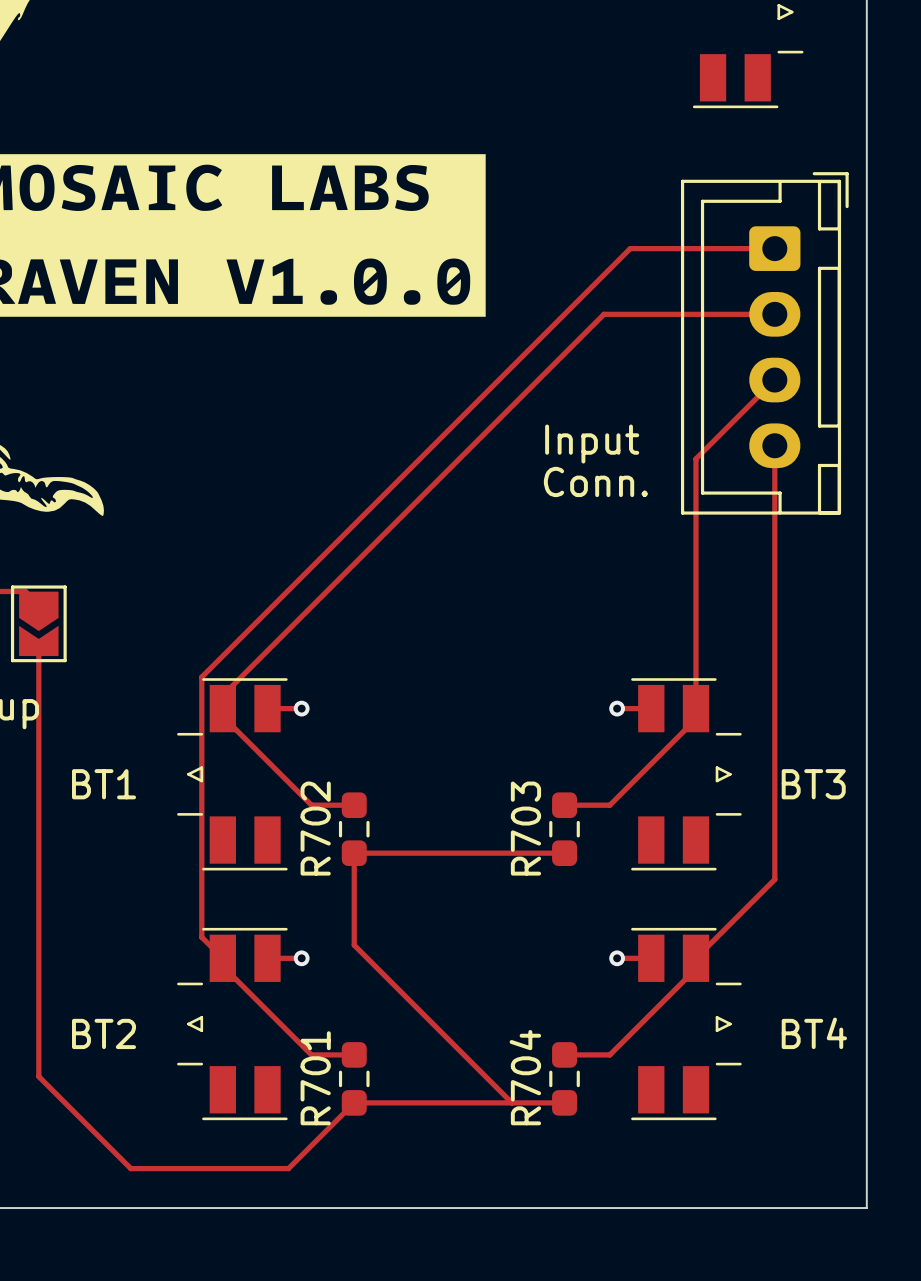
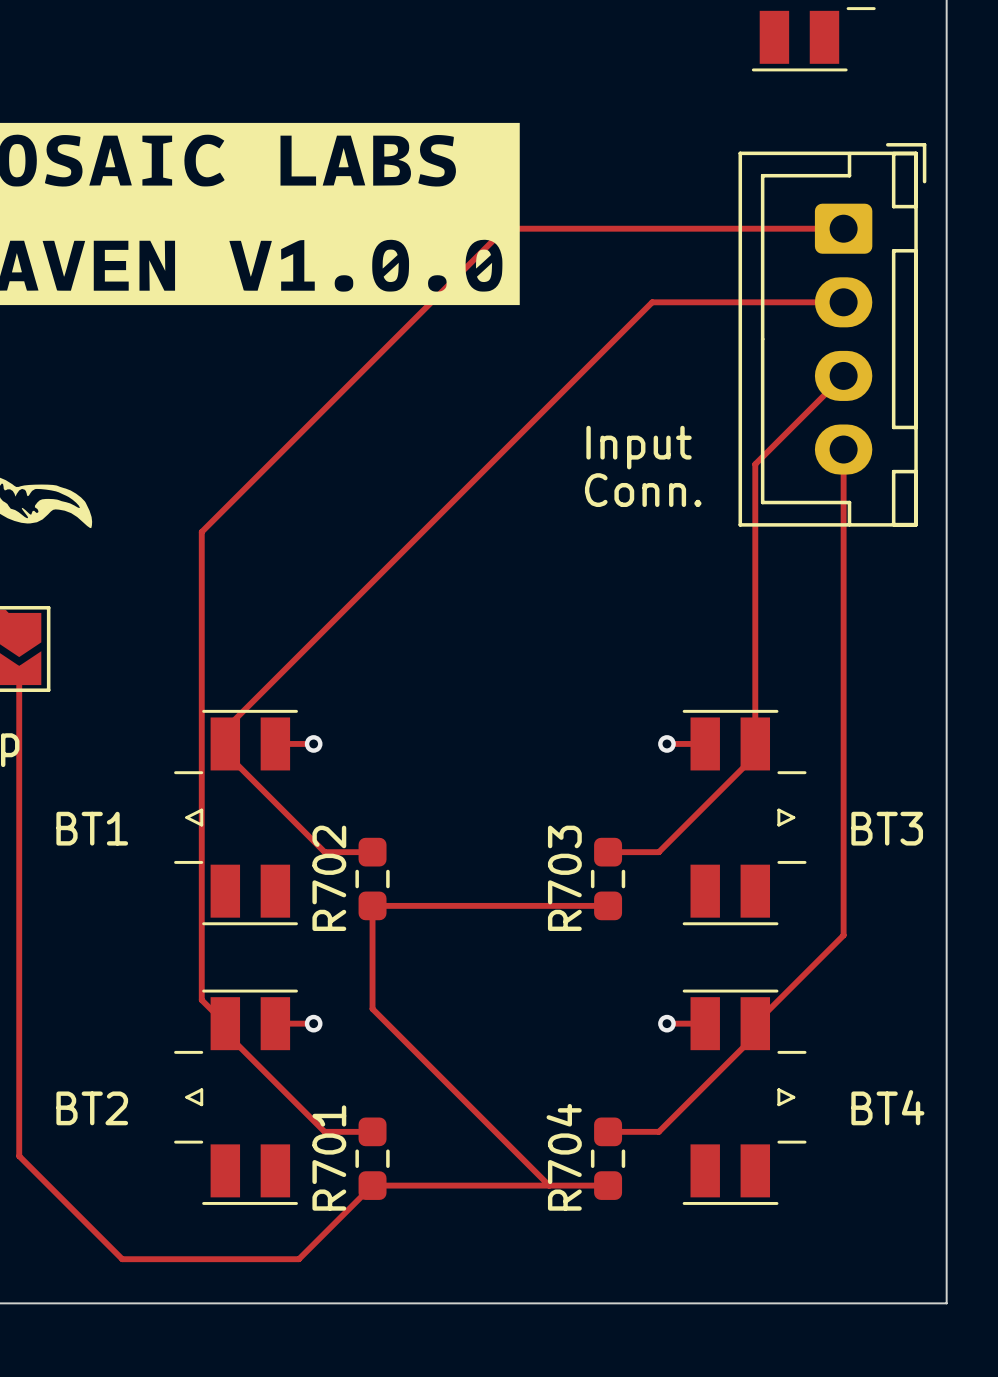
track: (630, 248) (201, 677) -> (681, 228) (505, 228) (201, 531) (201, 708)

